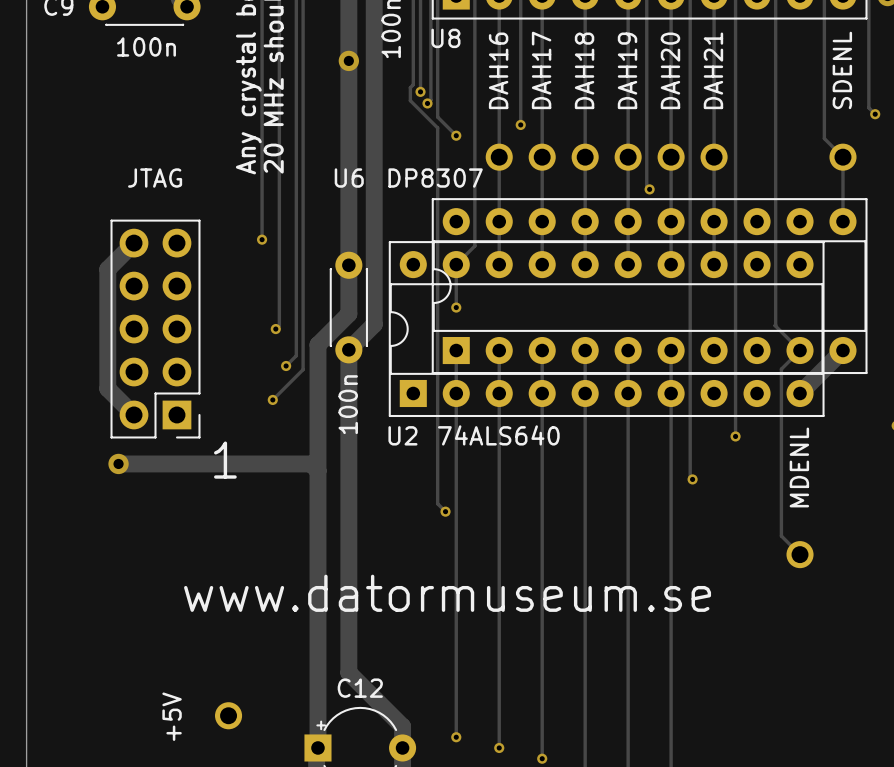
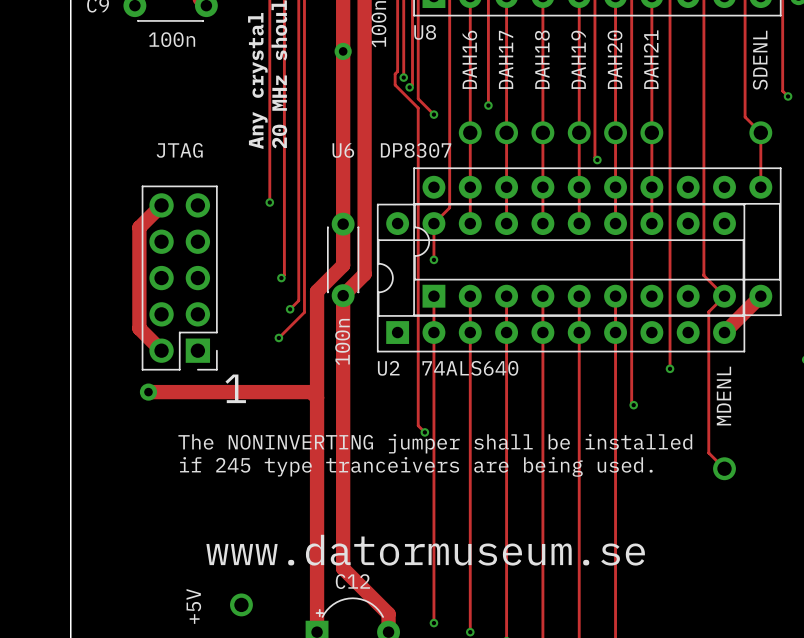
text: none -> The NONINVERTING jumper shall be installed (435, 443)
text: none -> if 245 type tranceivers are being used. (416, 466)
text position: www.datormuseum.se (447, 593) -> www.datormuseum.se (425, 550)

